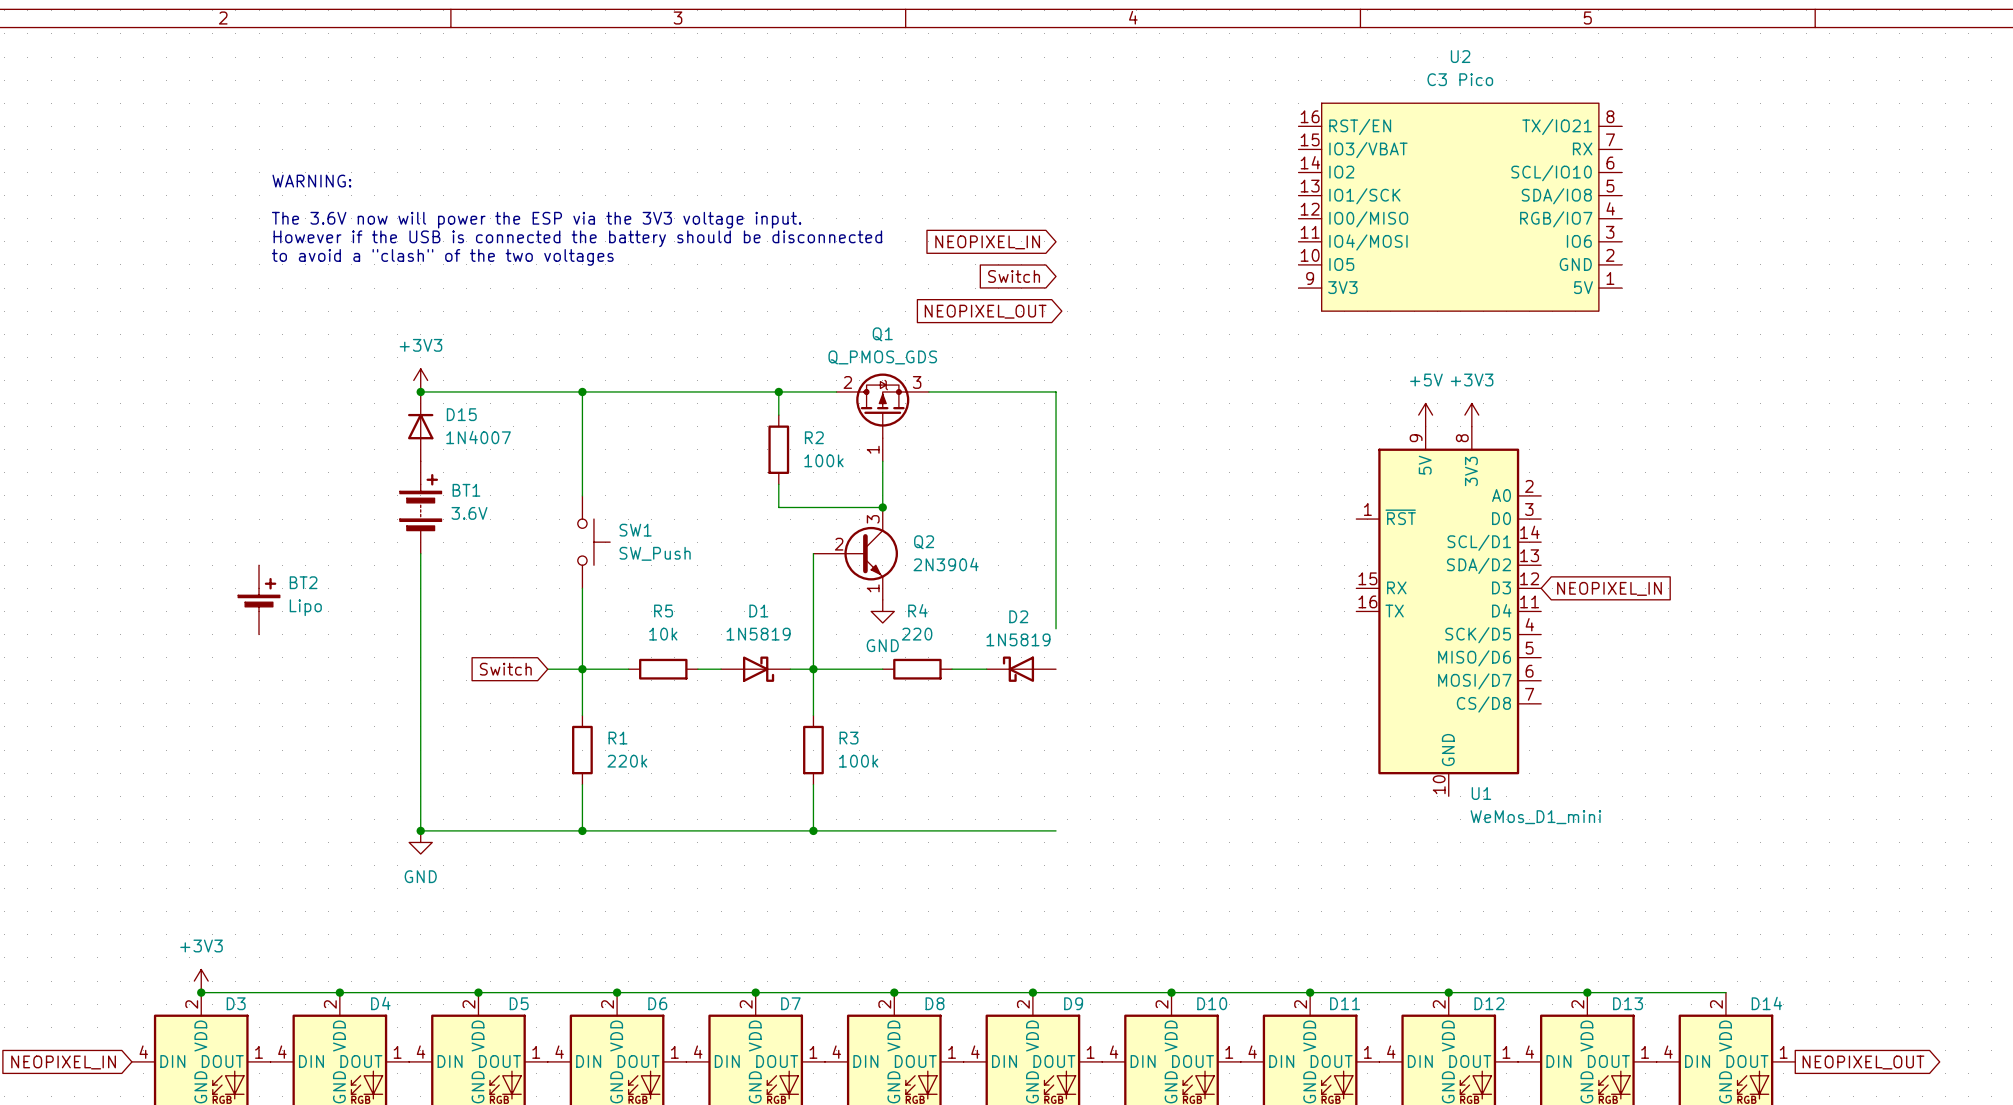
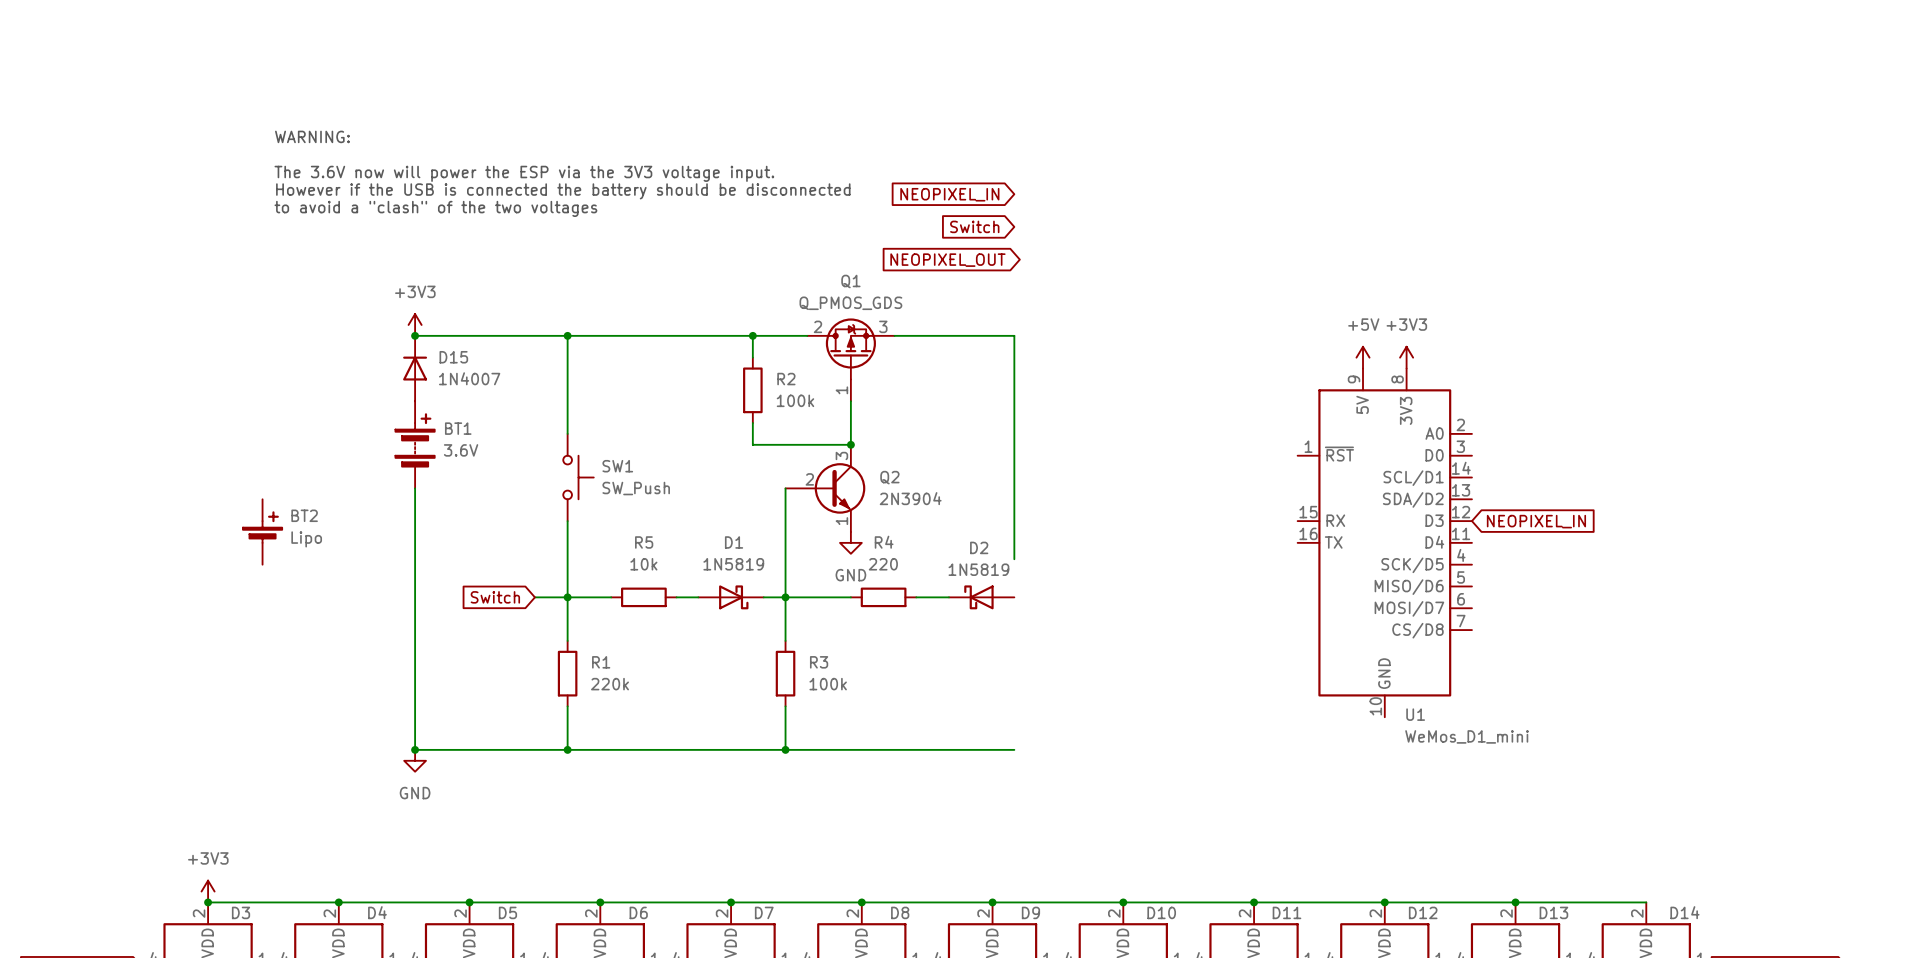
U2: C3 Pico (1460, 207) -> none

